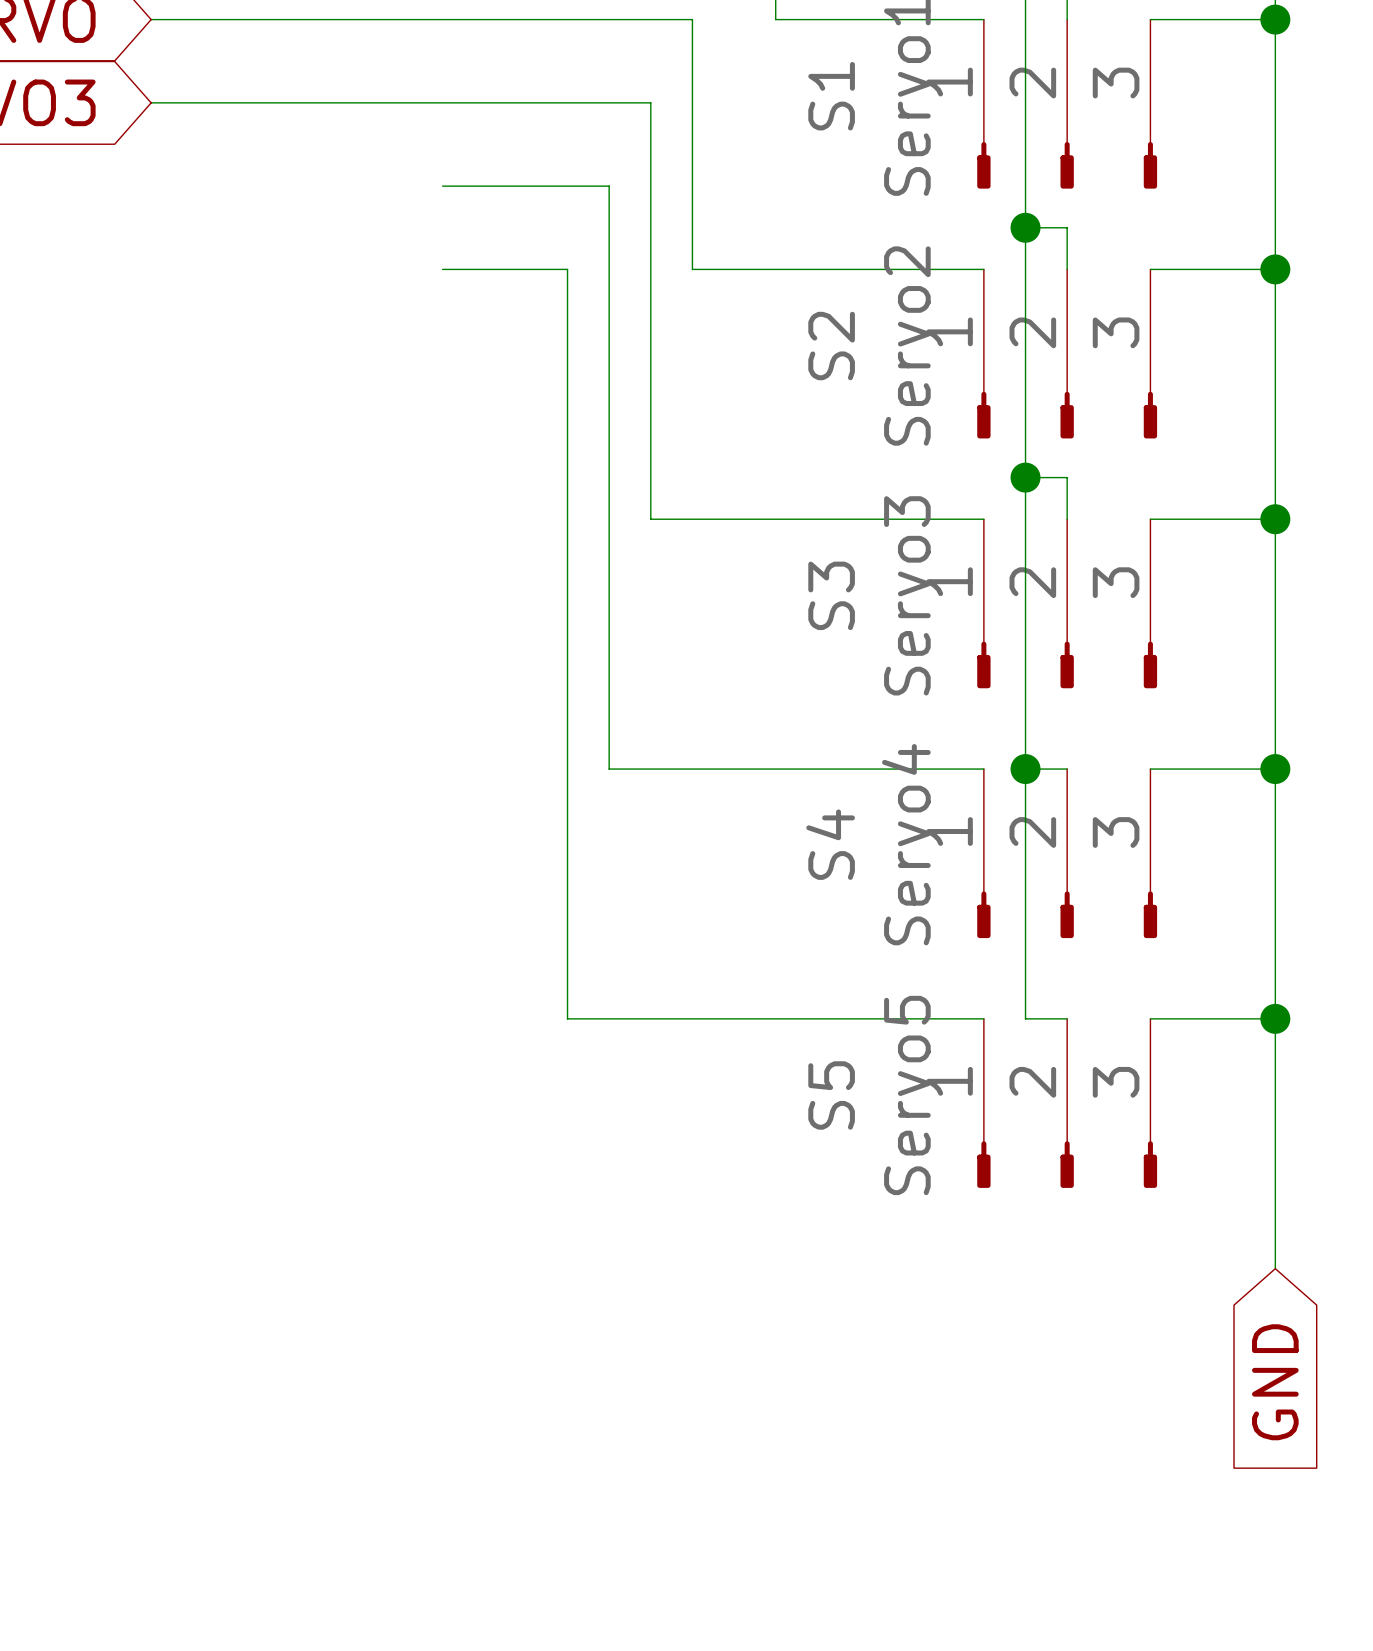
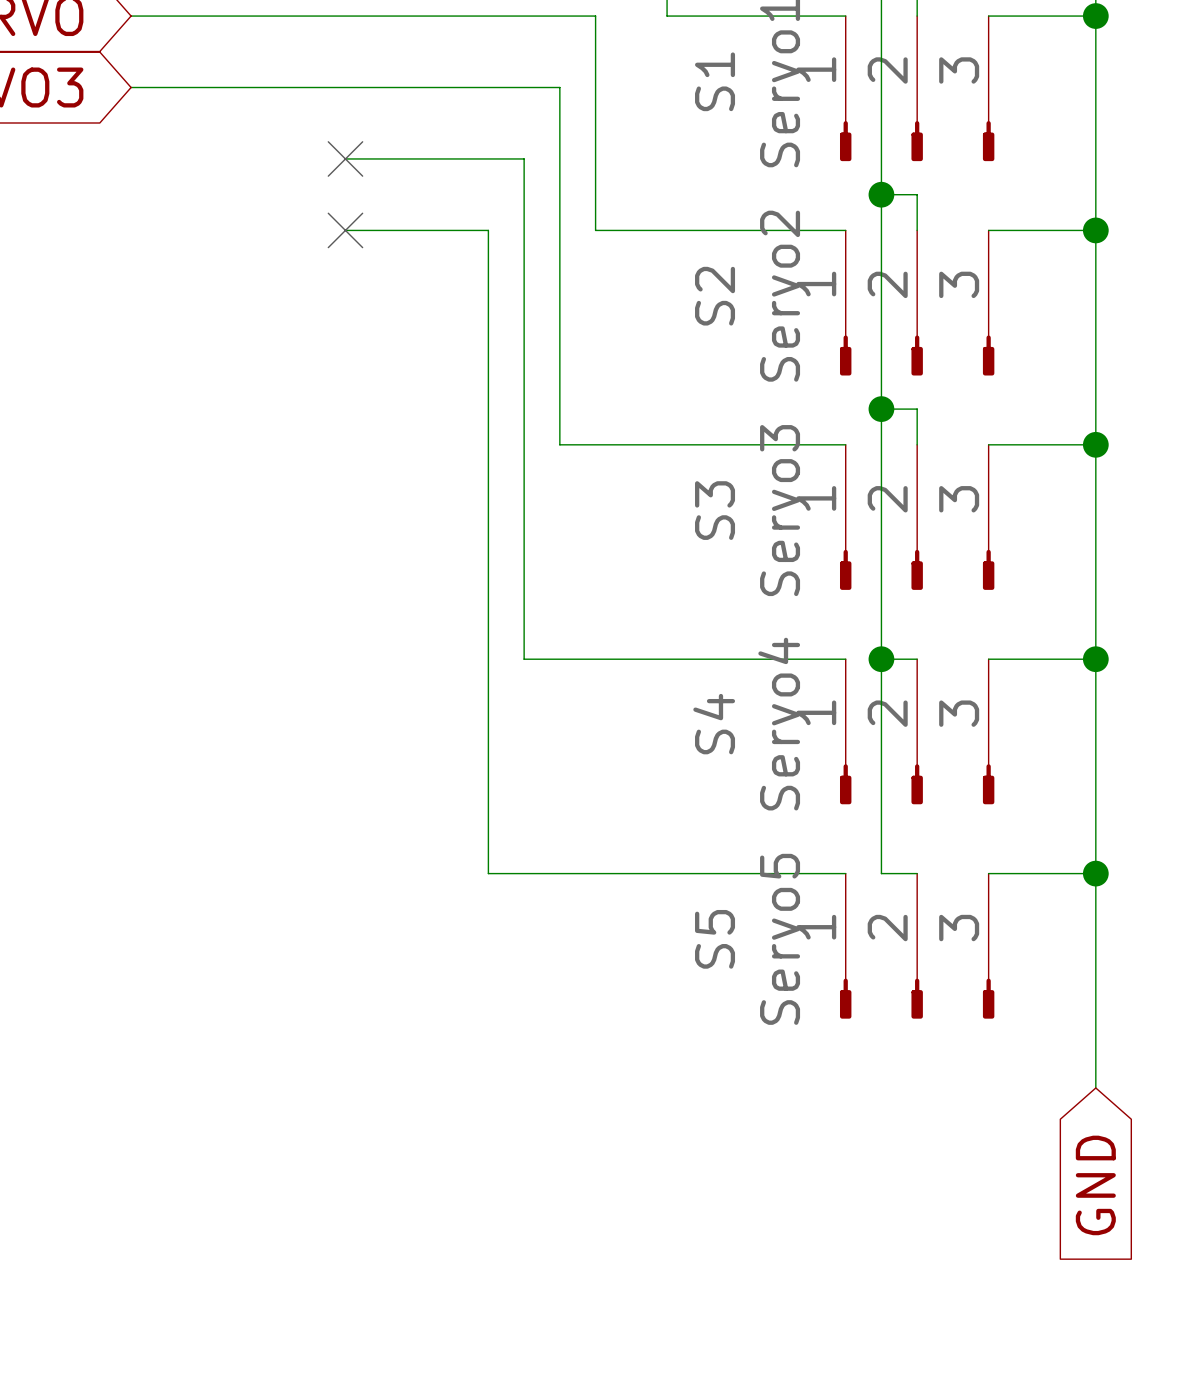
wire: none -> (345, 158) (381, 158)
no-connect mark: none -> (345, 158)
wire: none -> (345, 230) (381, 230)
no-connect mark: none -> (345, 230)

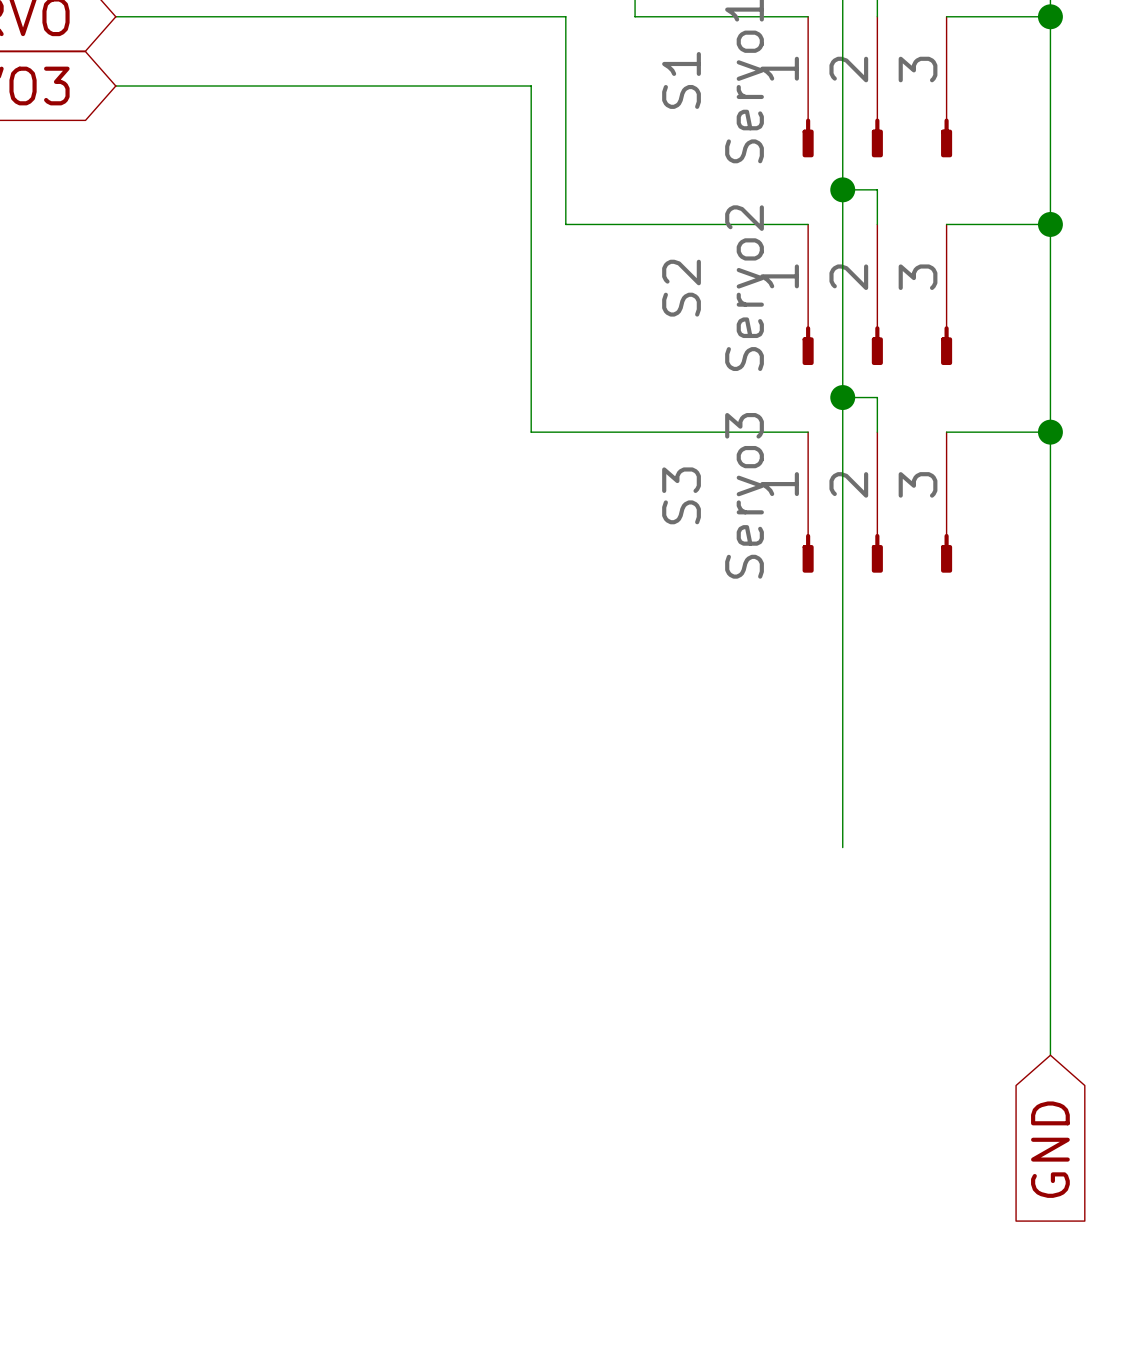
wire: (345, 158) (524, 158) (524, 659) (845, 659) -> none
no-connect mark: (345, 158) -> none
wire: (345, 230) (488, 230) (488, 873) (845, 873) -> none
no-connect mark: (345, 230) -> none
wire: (881, 659) (917, 659) -> none
junction: (881, 659) -> none
wire: (988, 659) (1095, 659) -> none
junction: (1095, 659) -> none
S4: Servo4 (917, 731) -> none
wire: (881, 873) (917, 873) -> none
wire: (988, 873) (1095, 873) -> none
junction: (1095, 873) -> none
S5: Servo5 (917, 946) -> none

